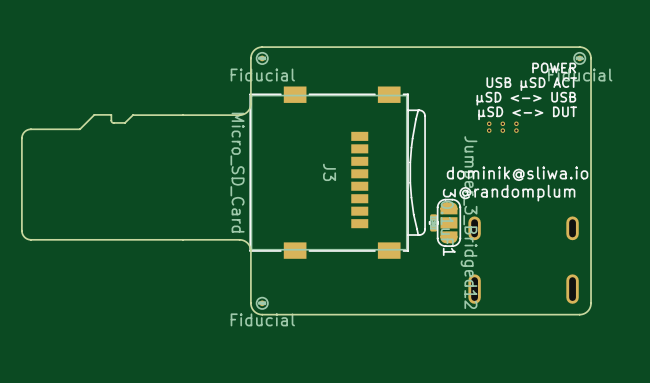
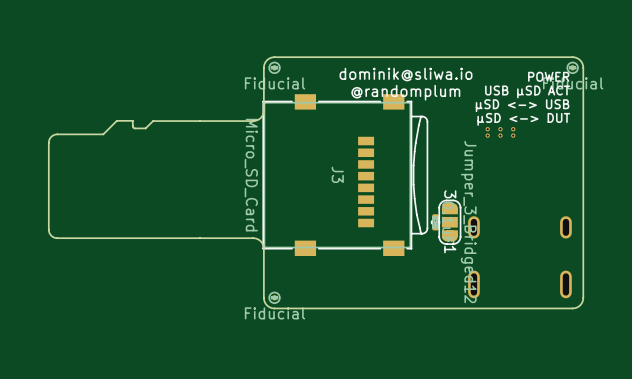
text position: dominik@sliwa.io (517, 173) -> dominik@sliwa.io (406, 74)
text position: @randomplum (517, 193) -> @randomplum (405, 92)

